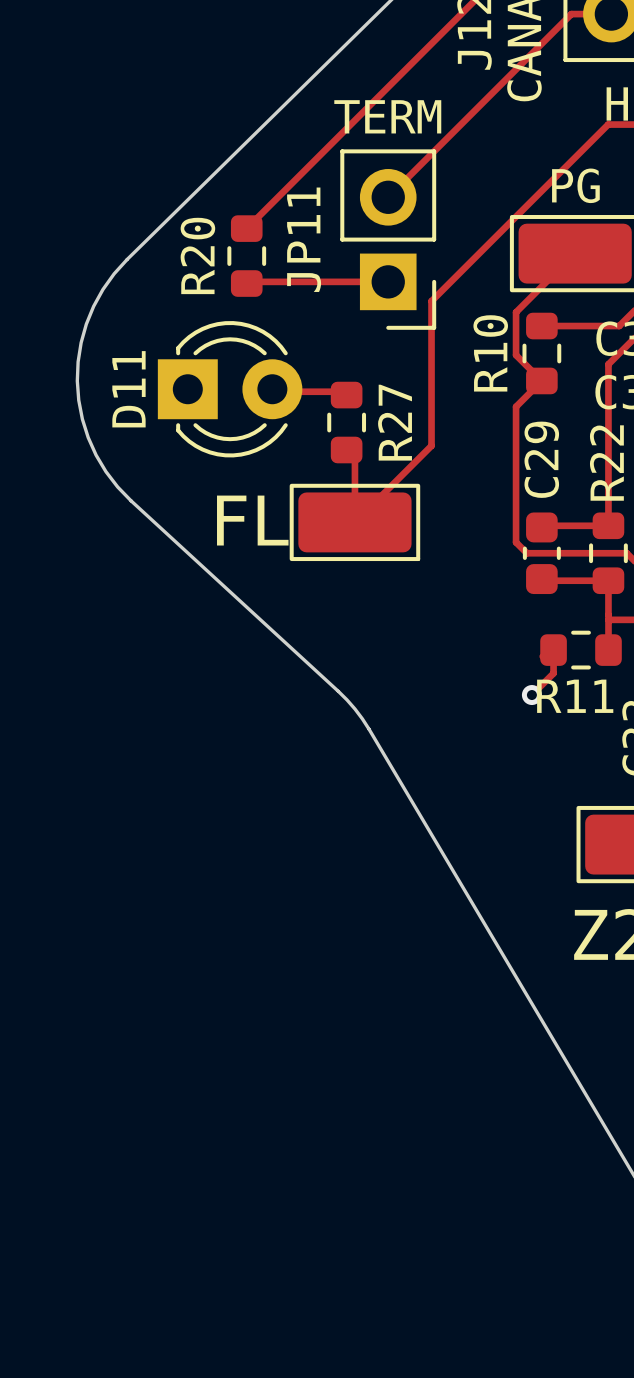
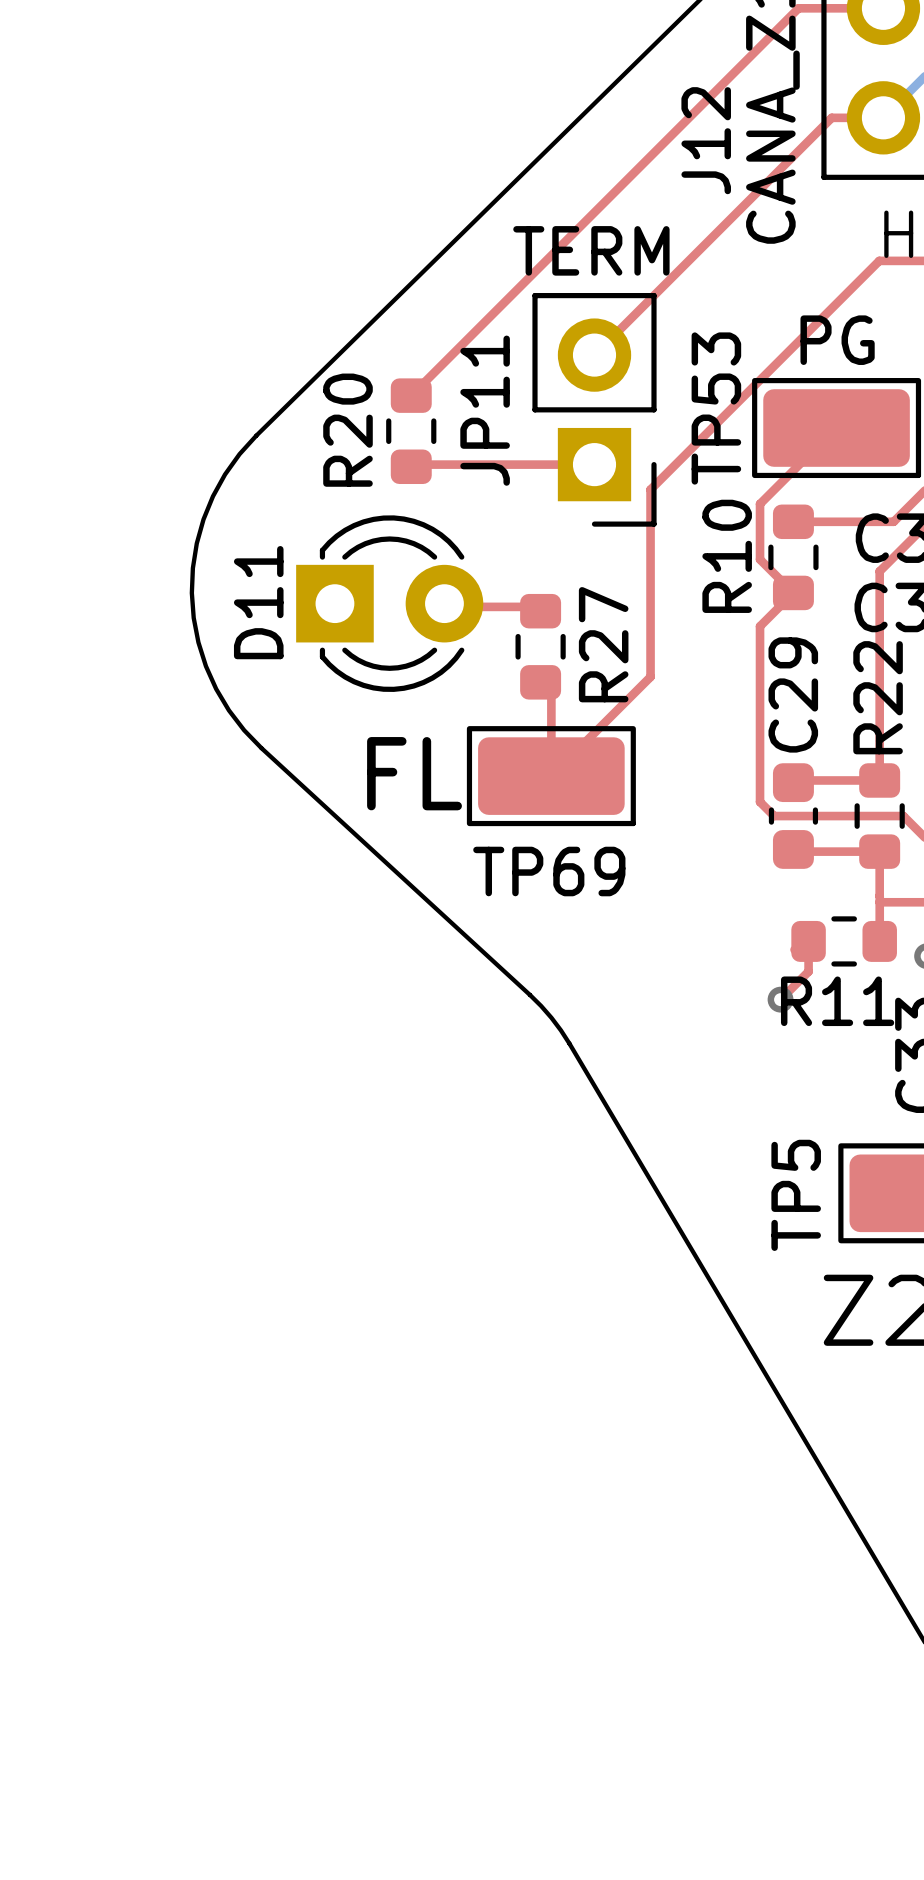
TP53 name: none -> TP53 (716, 408)
TP69 name: none -> TP69 (549, 871)
TP5 name: none -> TP5 (796, 1195)

